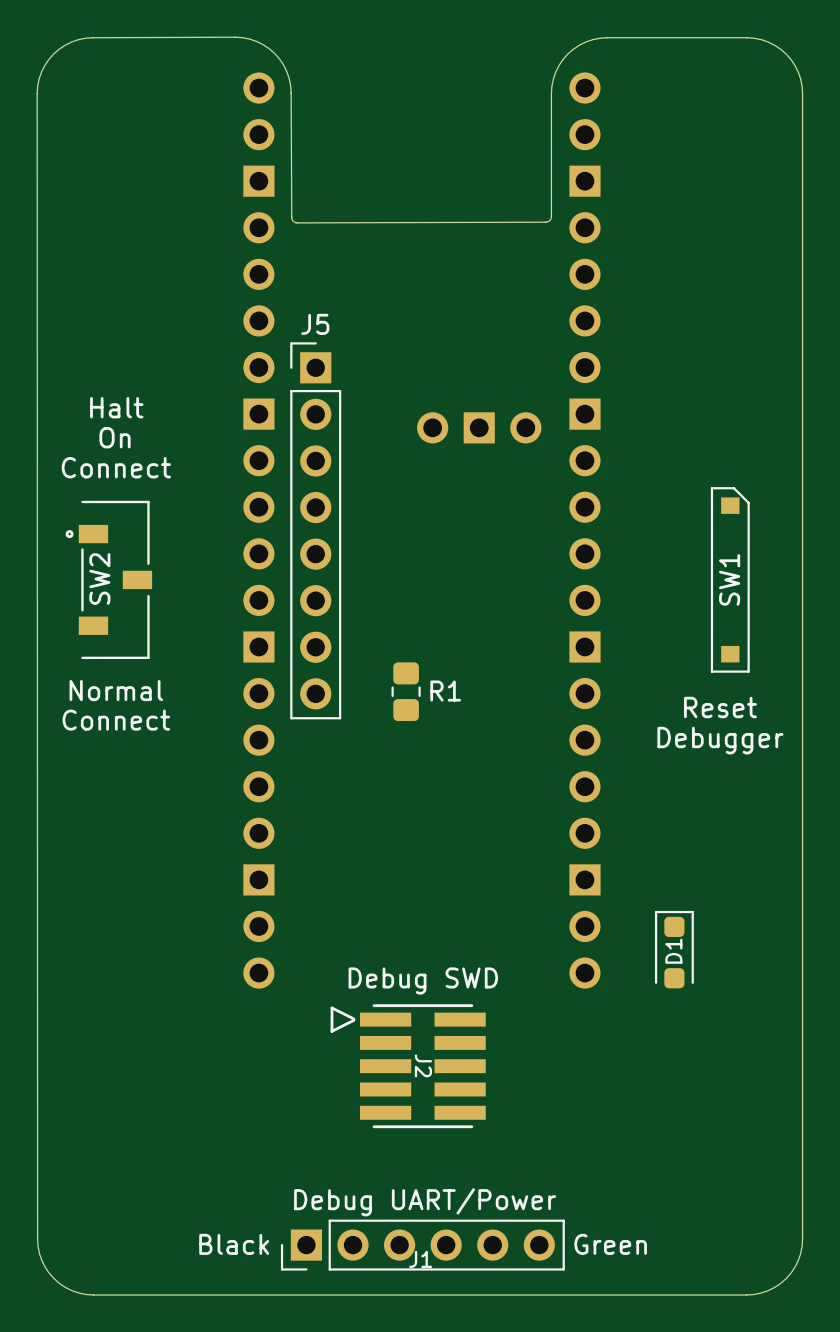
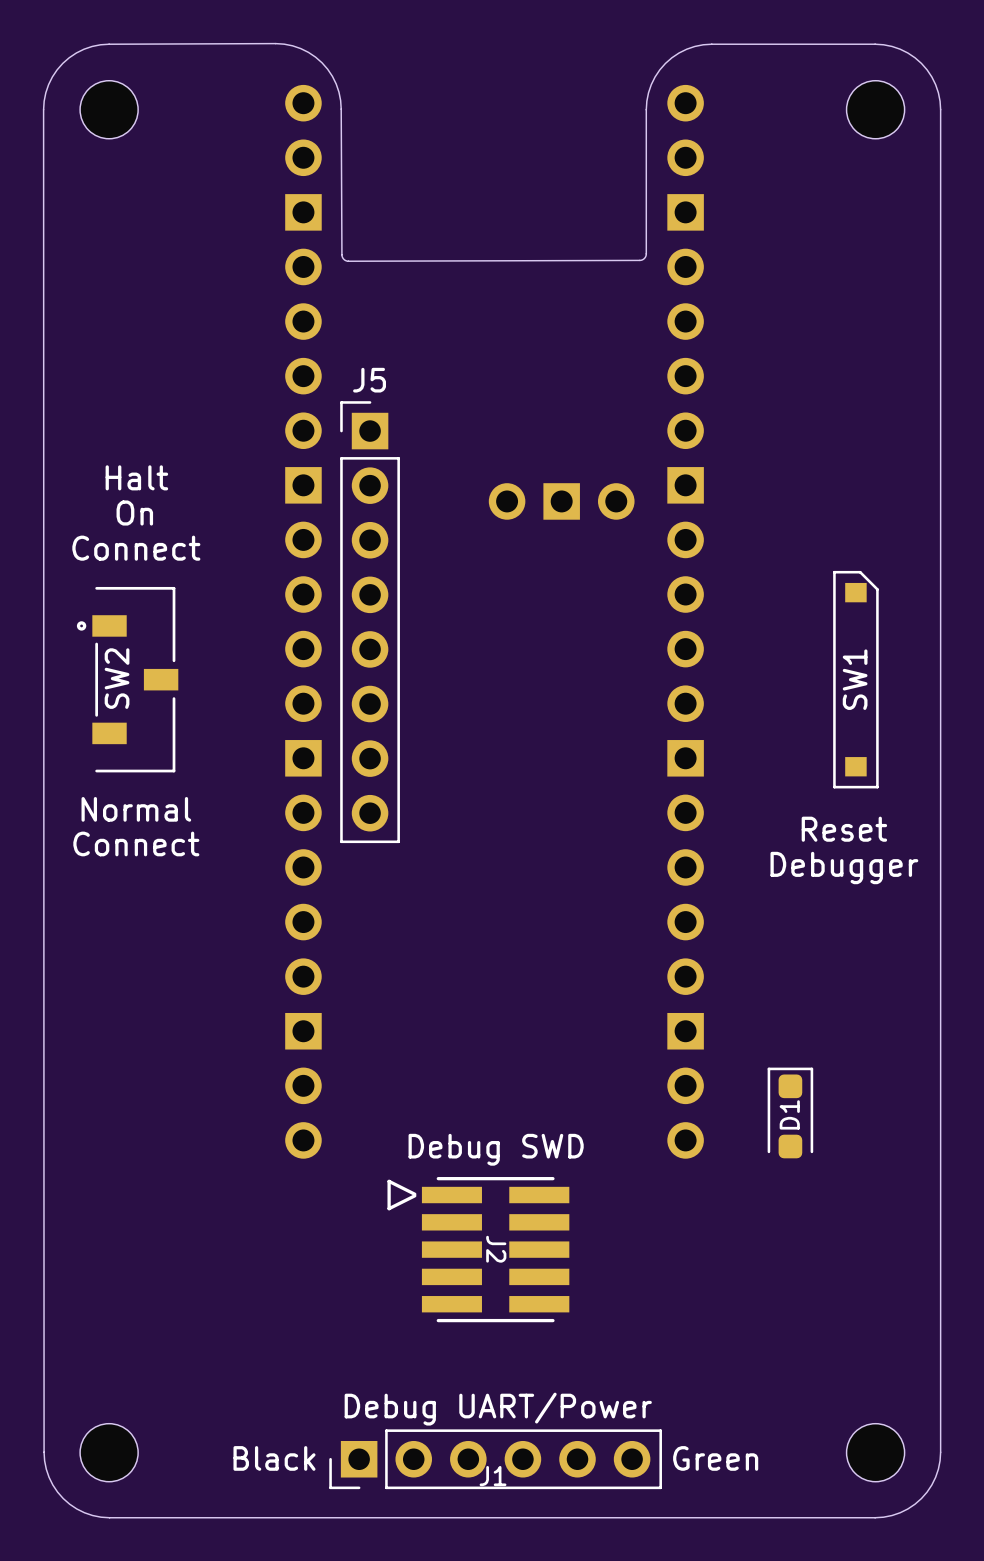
part: none -> (109, 109)
part: none -> (875, 109)
R1: (406, 691) -> none
part: none -> (109, 1452)
part: none -> (875, 1452)

